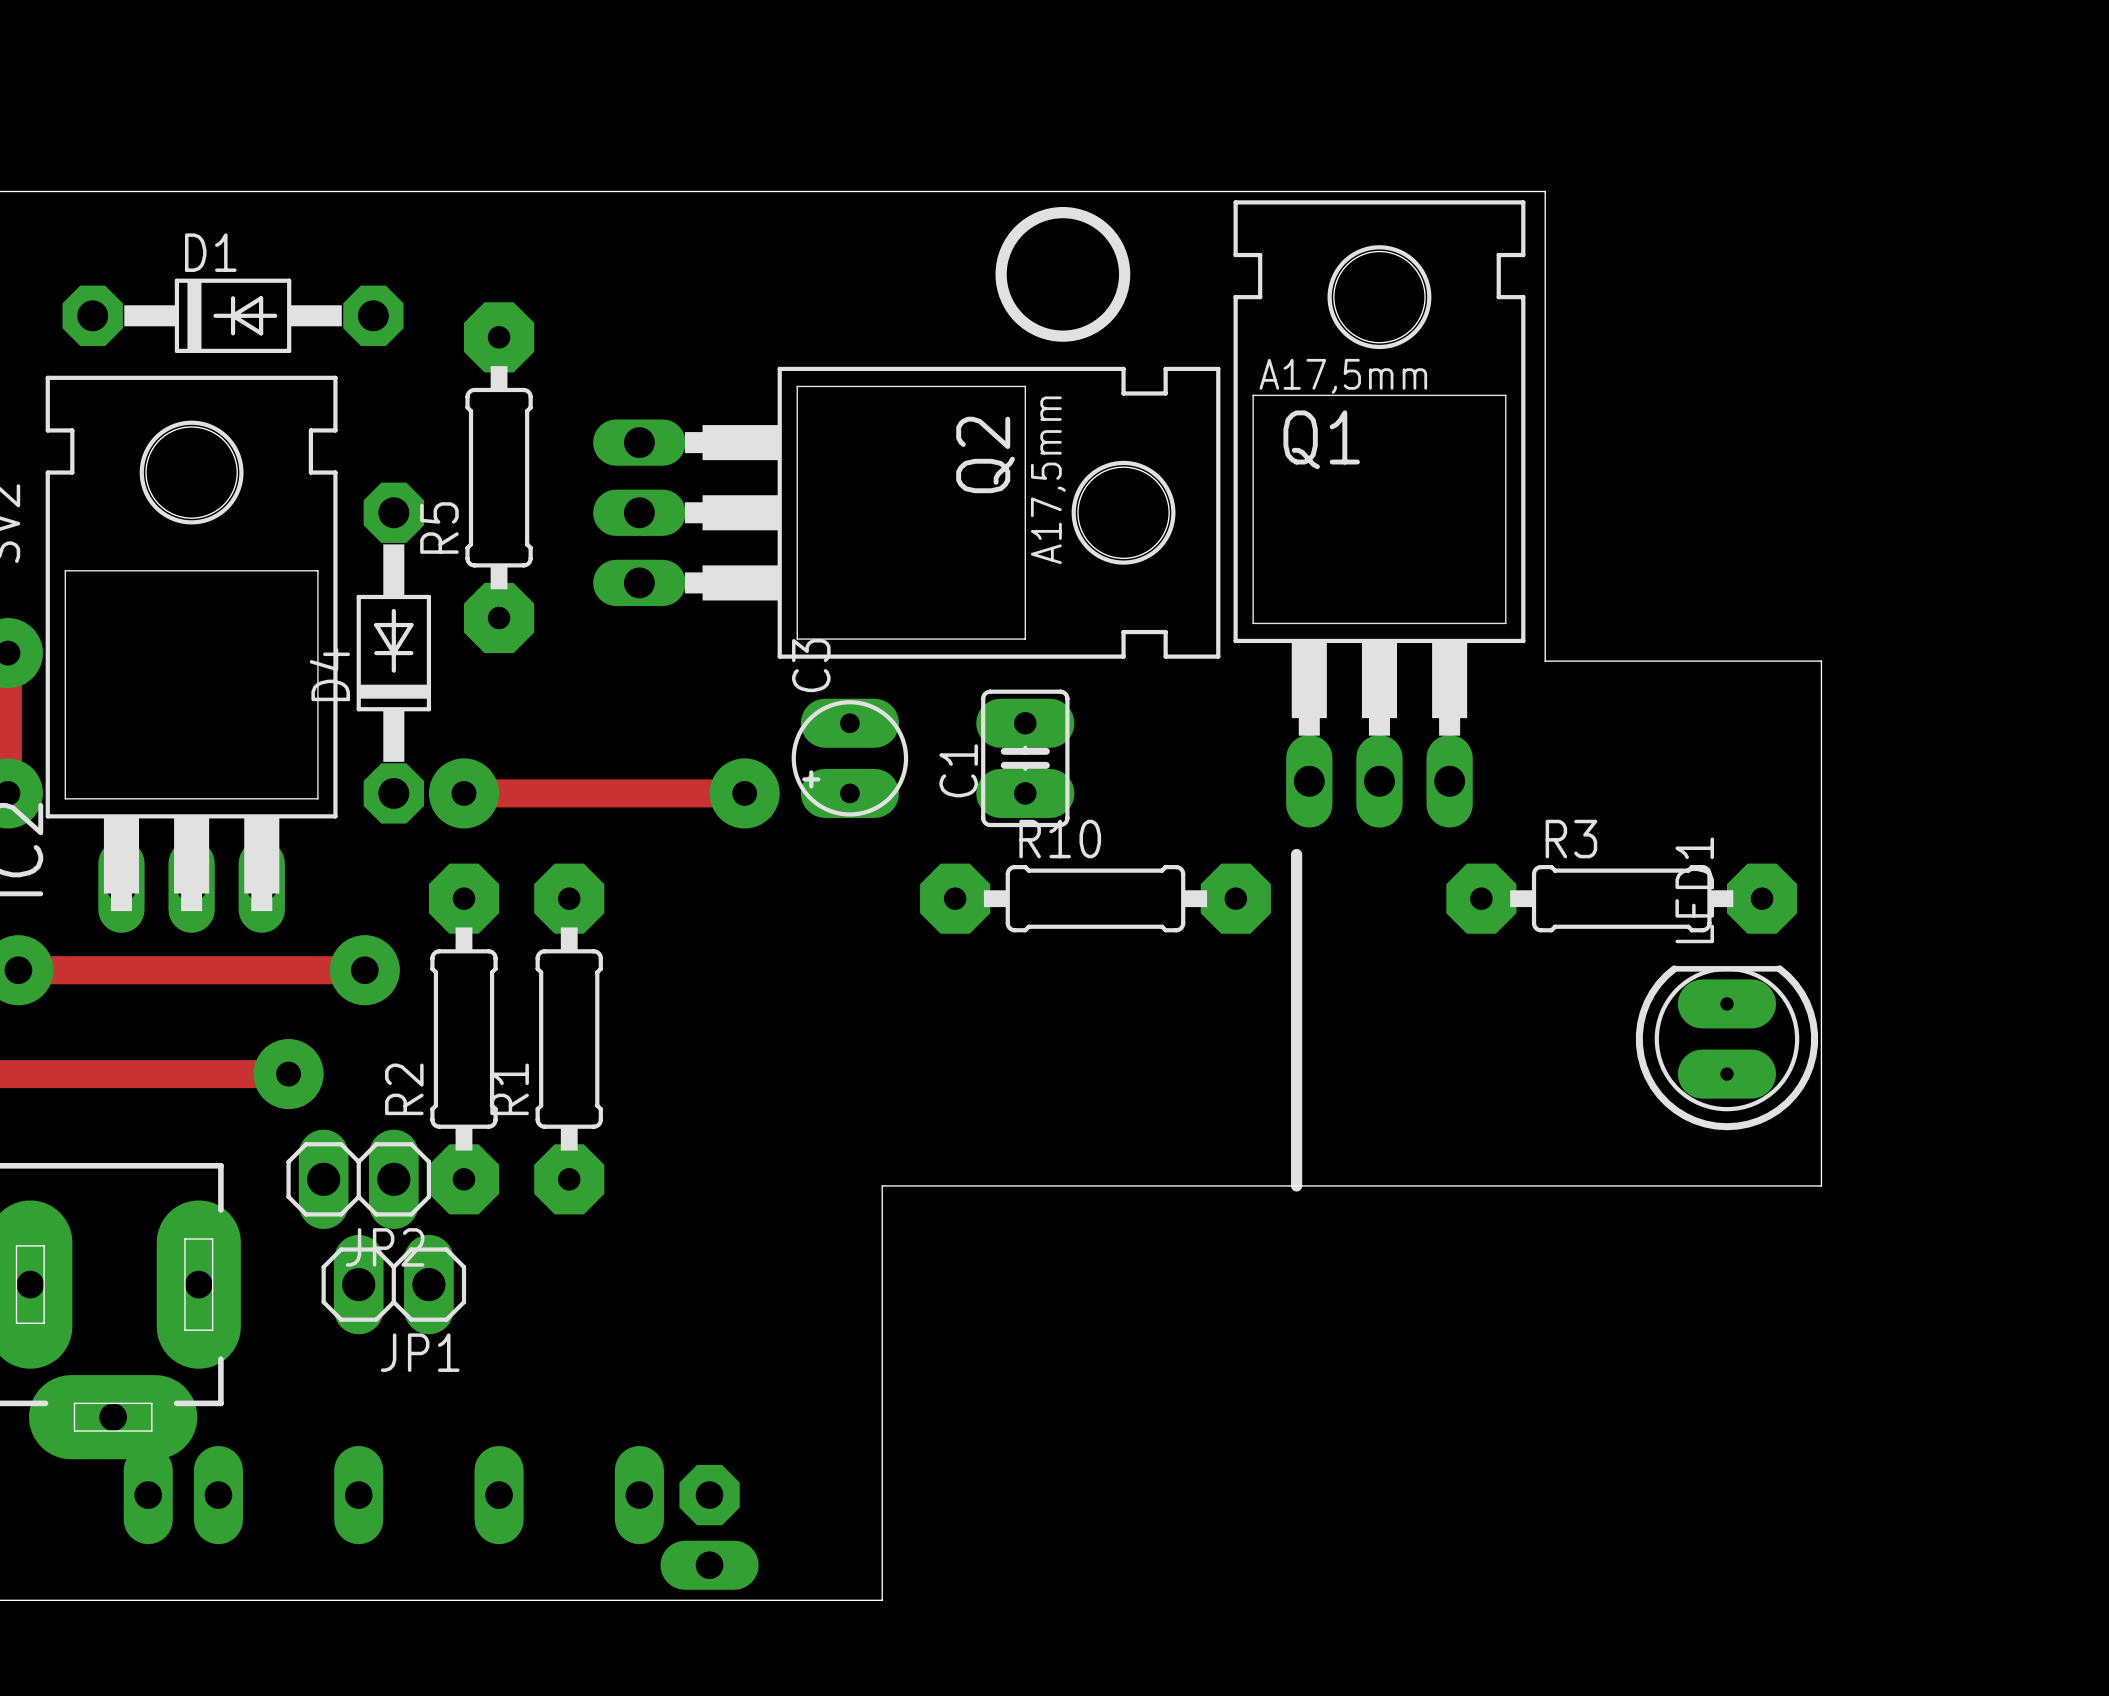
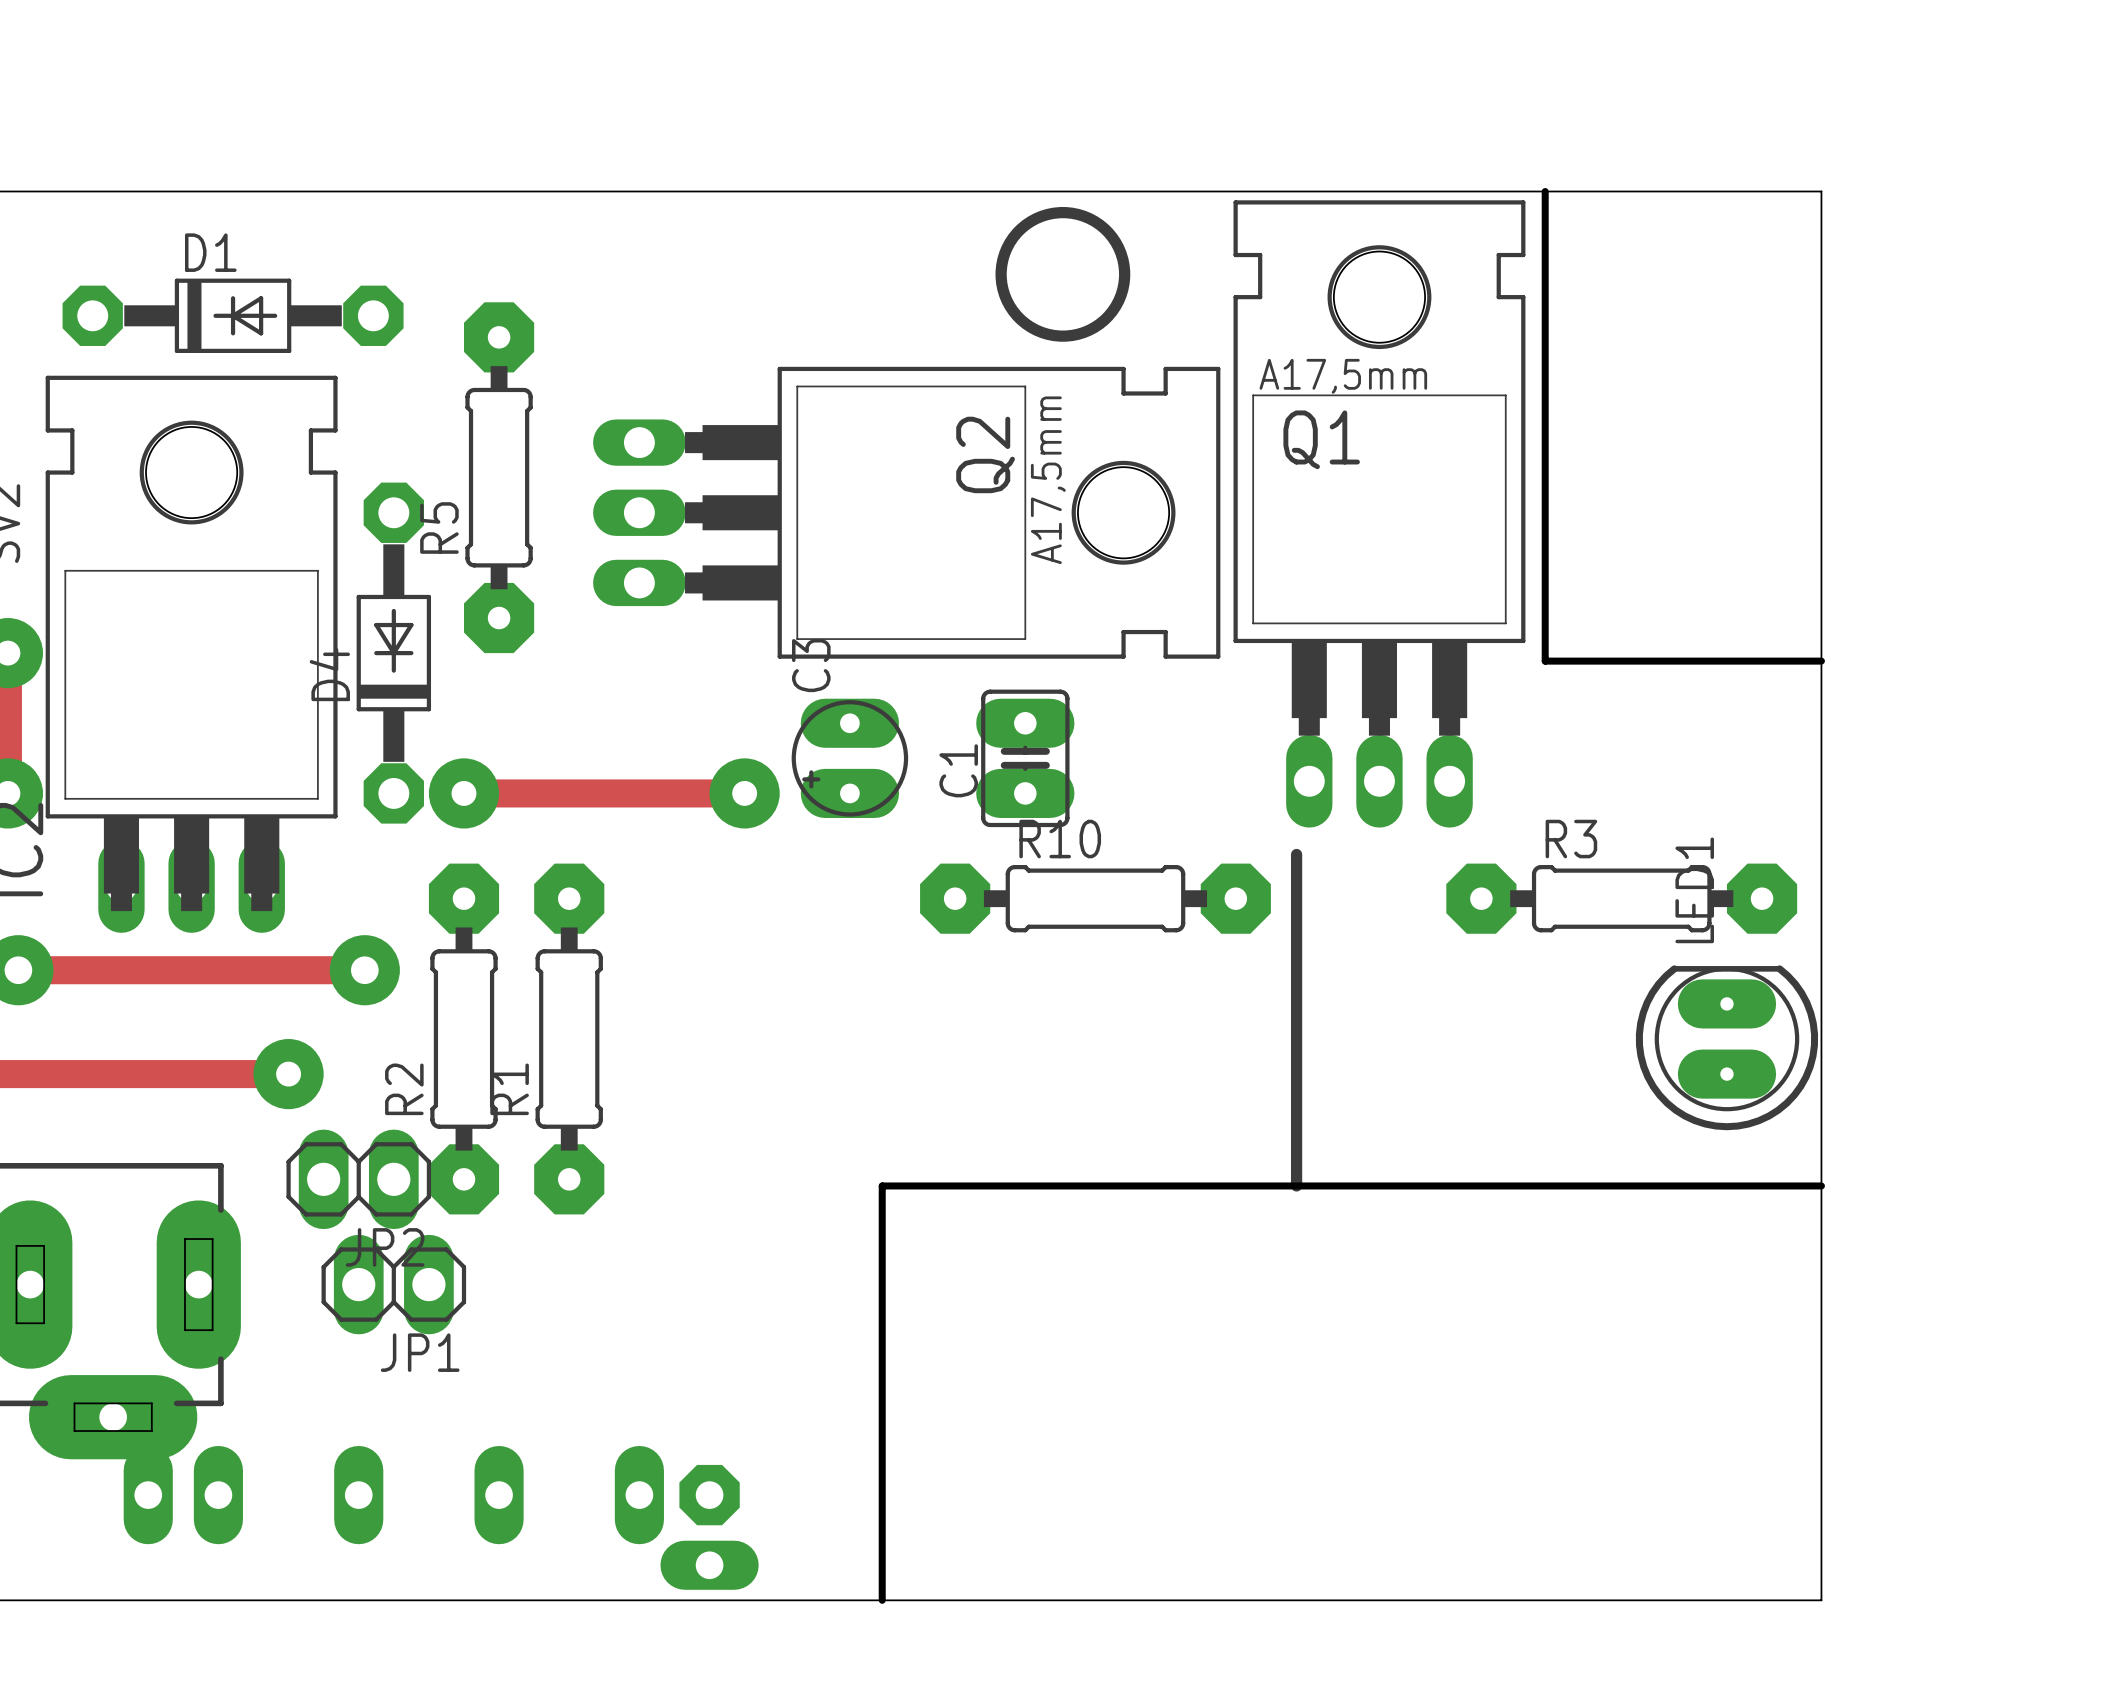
board edge: none -> (1545, 191) (1821, 191) (1821, 661)
board edge width: thin (1545, 191) (1545, 661) (1821, 661) -> thick (1545, 191) (1545, 661) (1821, 661)
board edge: none -> (1821, 1185) (1821, 1600) (882, 1600)
board edge width: thin (1821, 1185) (882, 1185) (882, 1600) -> thick (1821, 1185) (882, 1185) (882, 1600)

